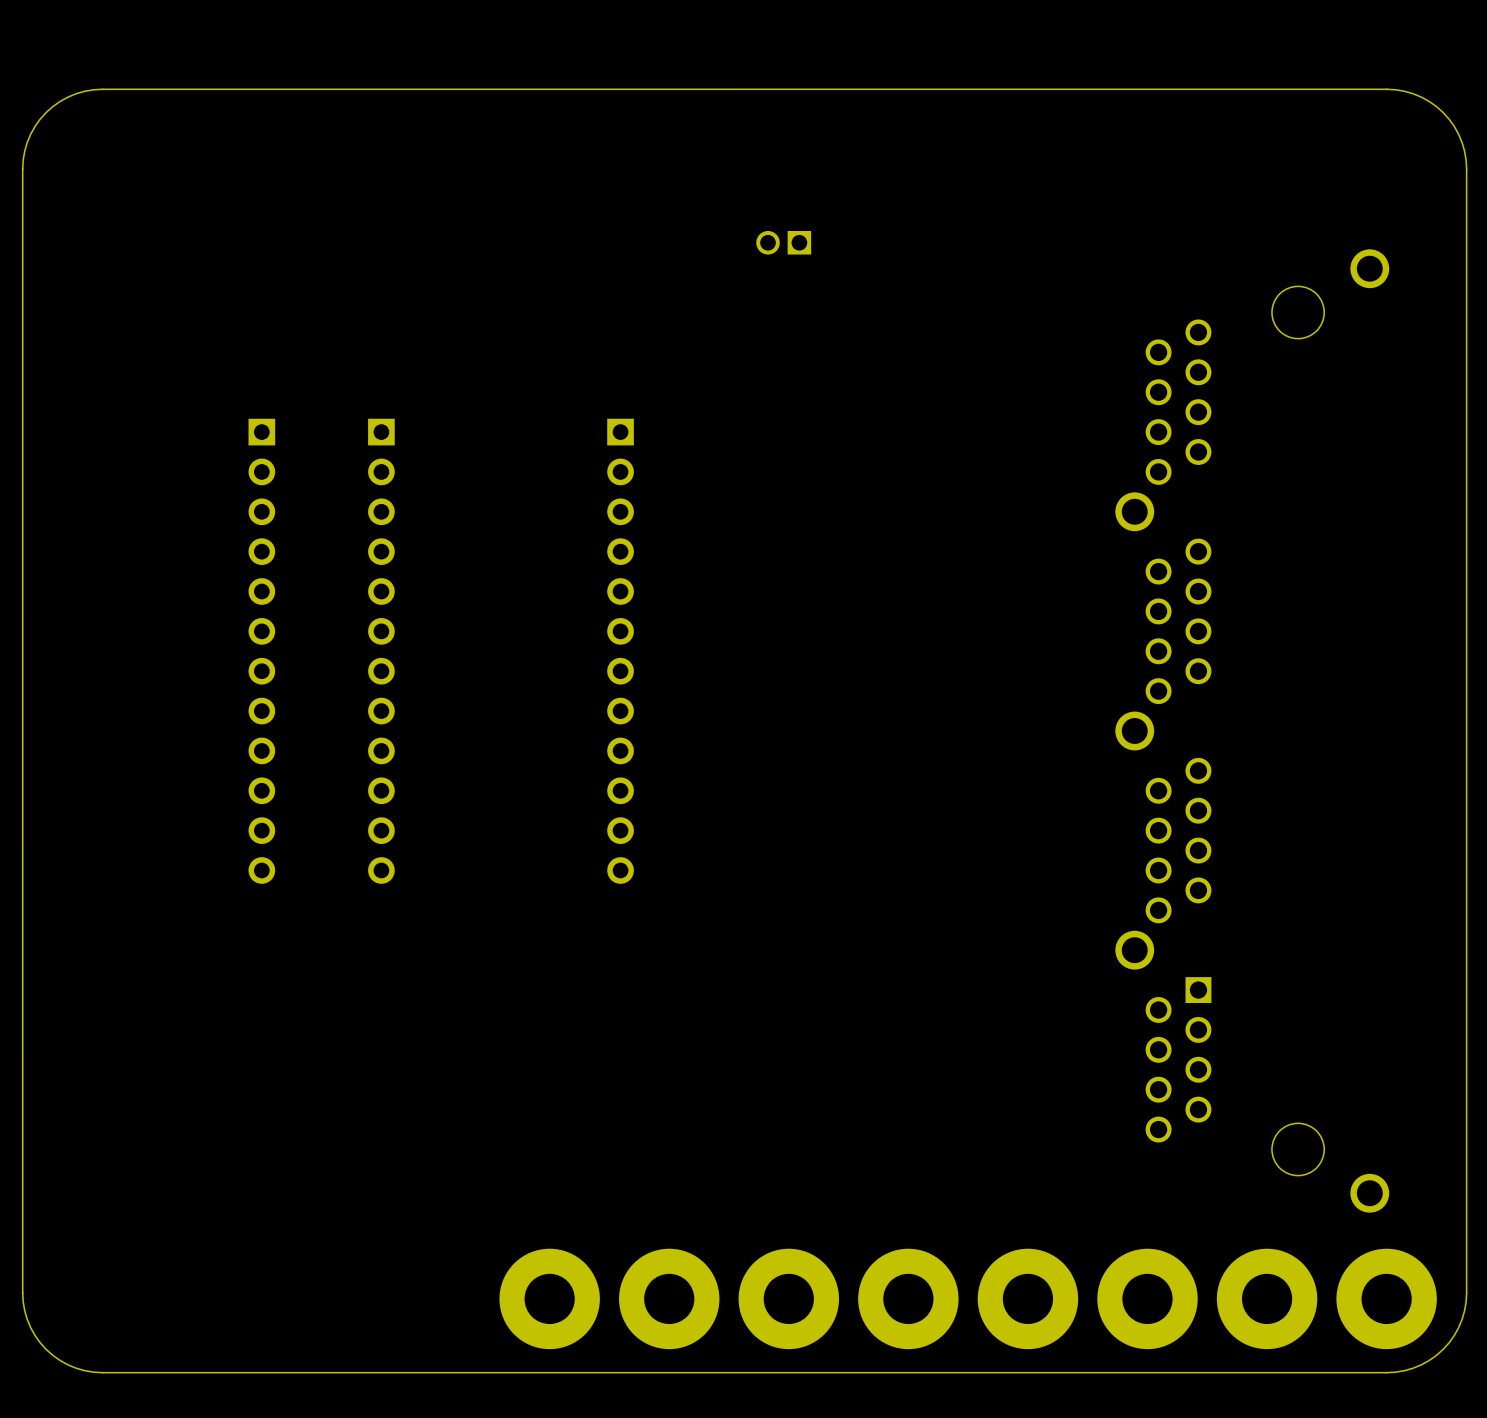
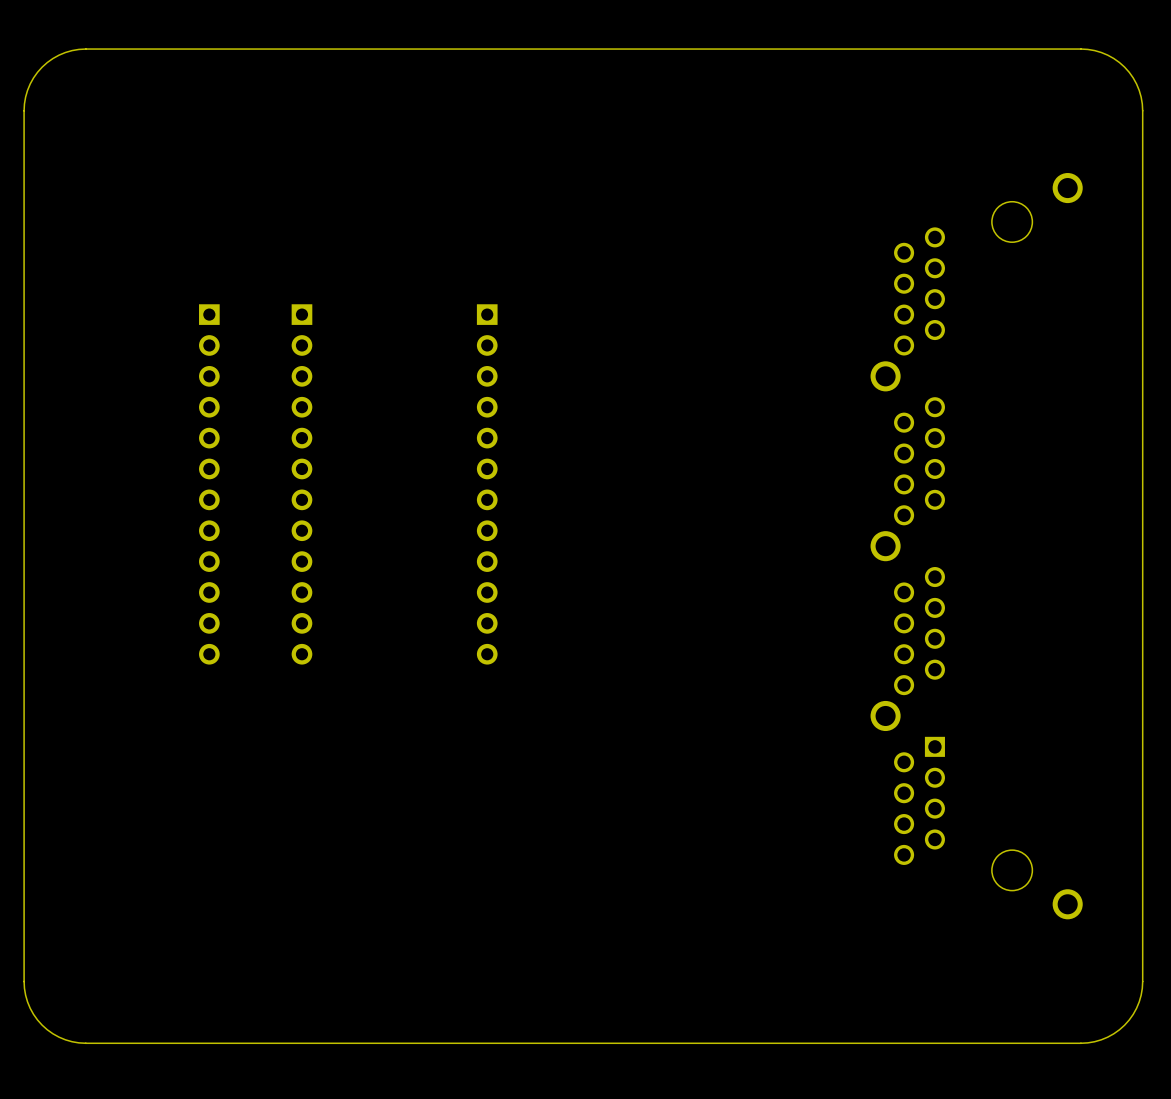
part: (783, 242) -> none
part: (549, 1298) -> none
part: (669, 1298) -> none
part: (788, 1298) -> none
part: (908, 1298) -> none
part: (1027, 1298) -> none
part: (1147, 1298) -> none
part: (1267, 1298) -> none
part: (1386, 1298) -> none

